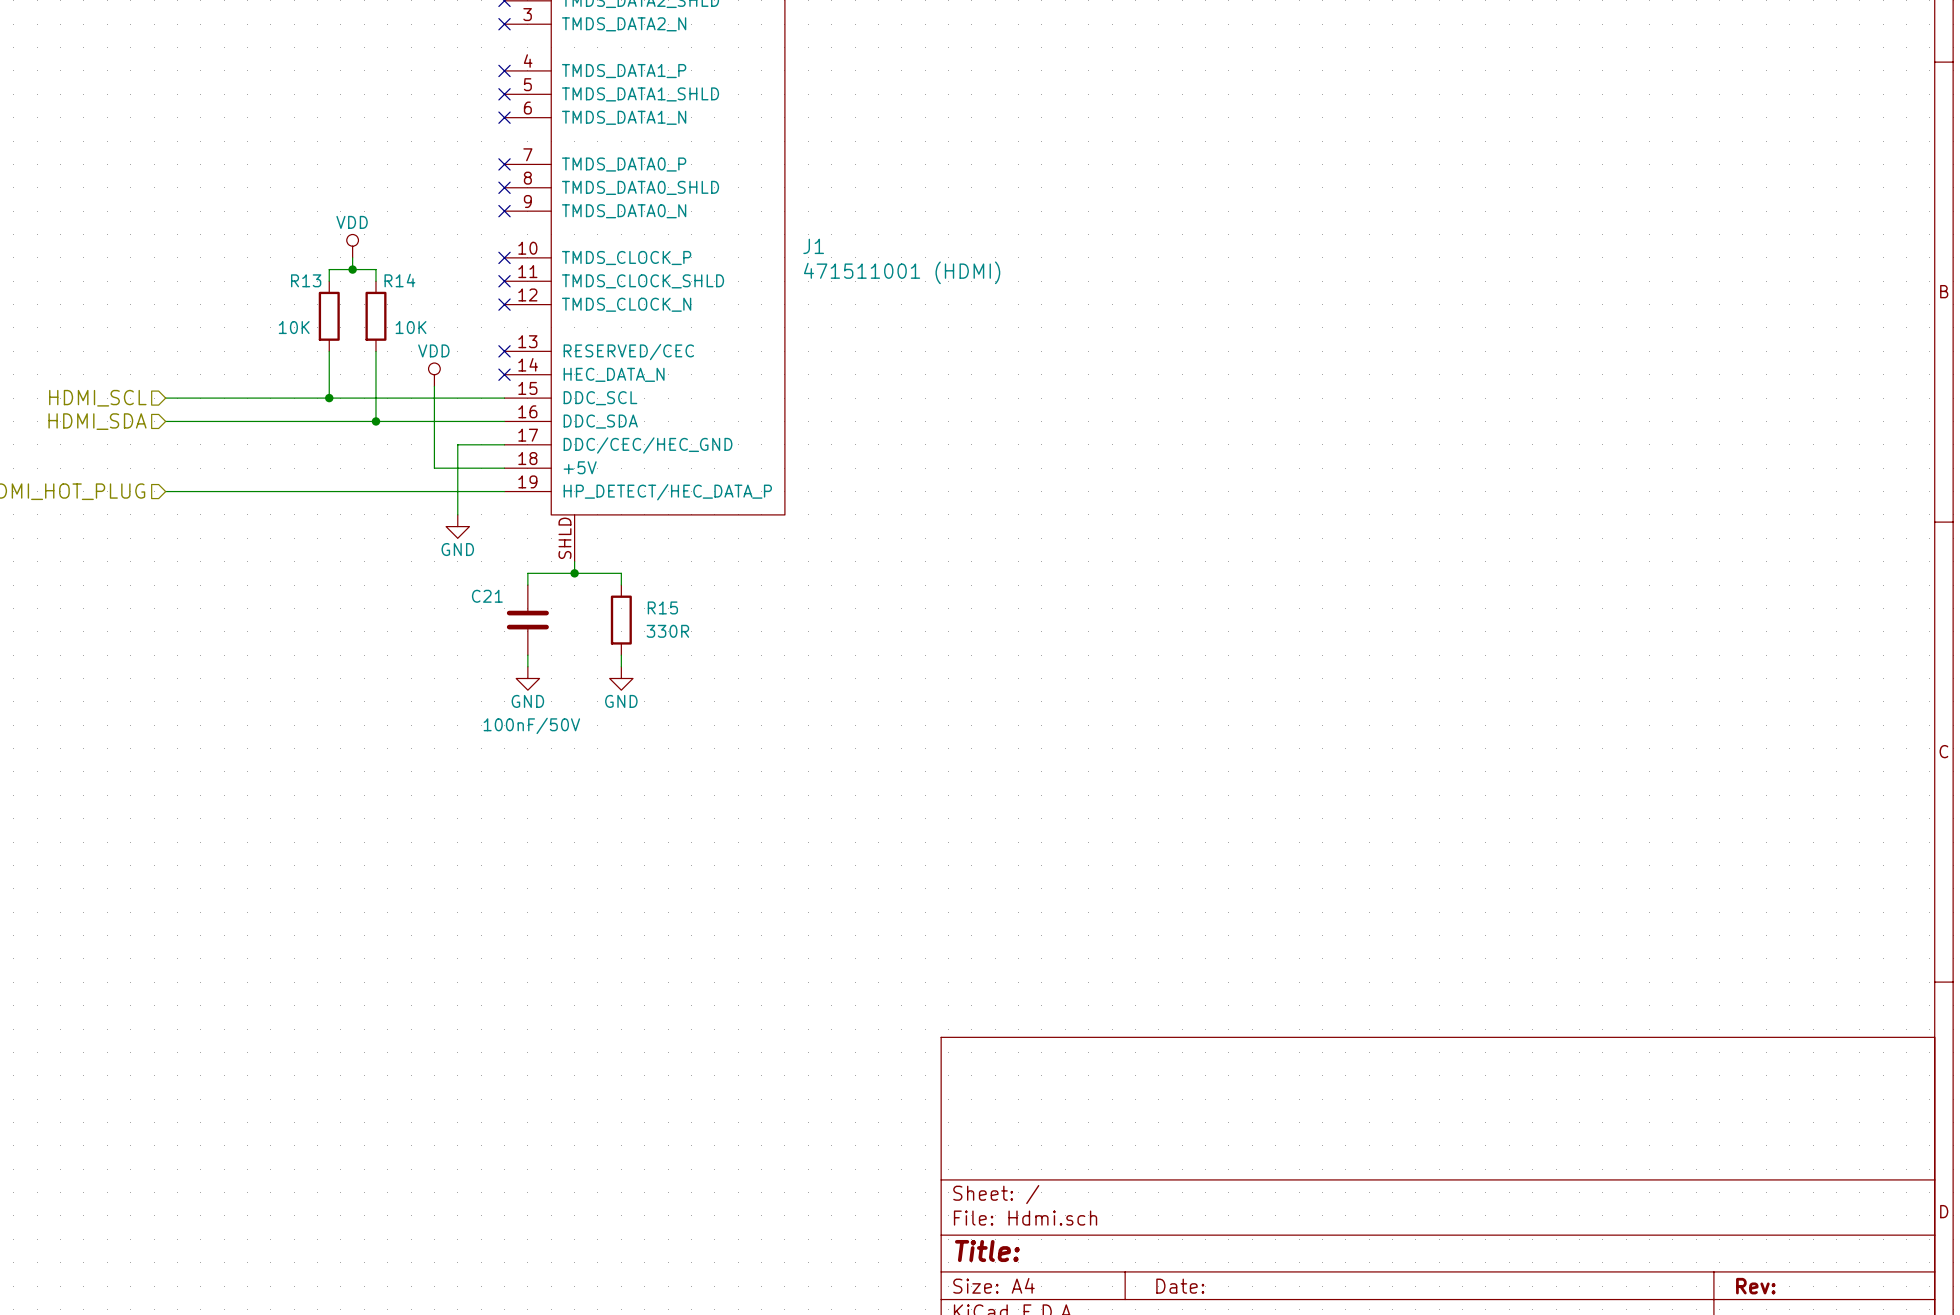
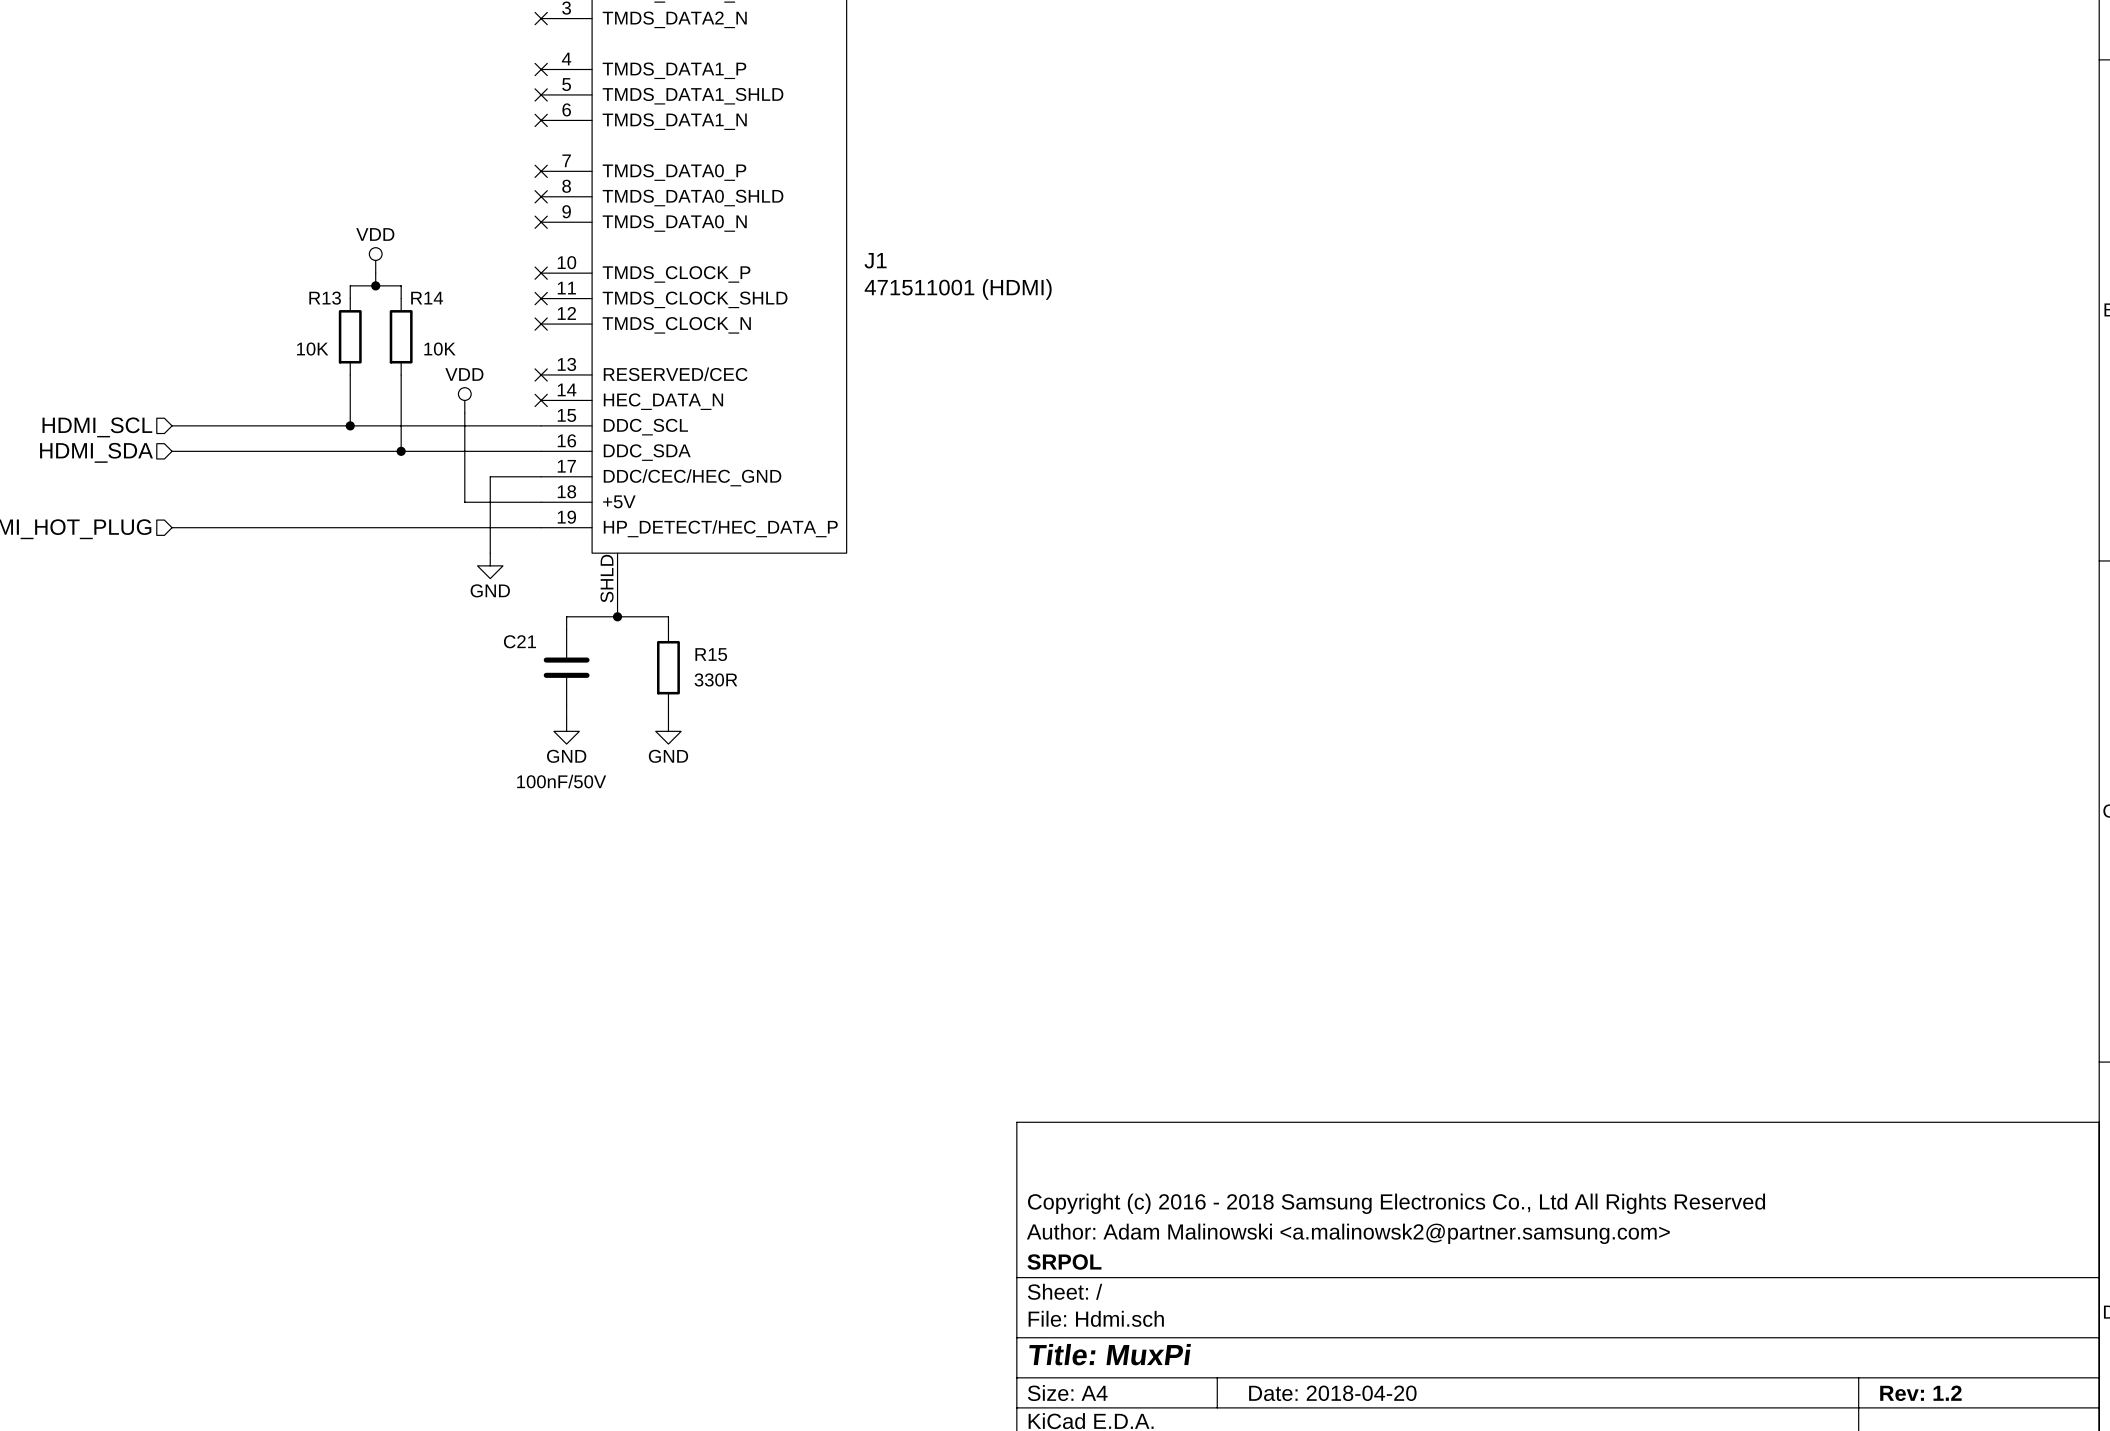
title block: none -> Copyright (c) 2016 - 2018 Samsung Electronics Co., Ltd All Rights Reserved (1396, 1203)
title block: none -> Author: Adam Malinowski <a.malinowsk2@partner.samsung.com> (1348, 1233)
title block: none -> SRPOL (1064, 1262)
title block: Title: (987, 1251) -> Title: MuxPi (1110, 1354)
title block: Date: (1180, 1286) -> Date: 2018-04-20 (1332, 1393)
title block: Rev: (1755, 1286) -> Rev: 1.2 (1920, 1393)

